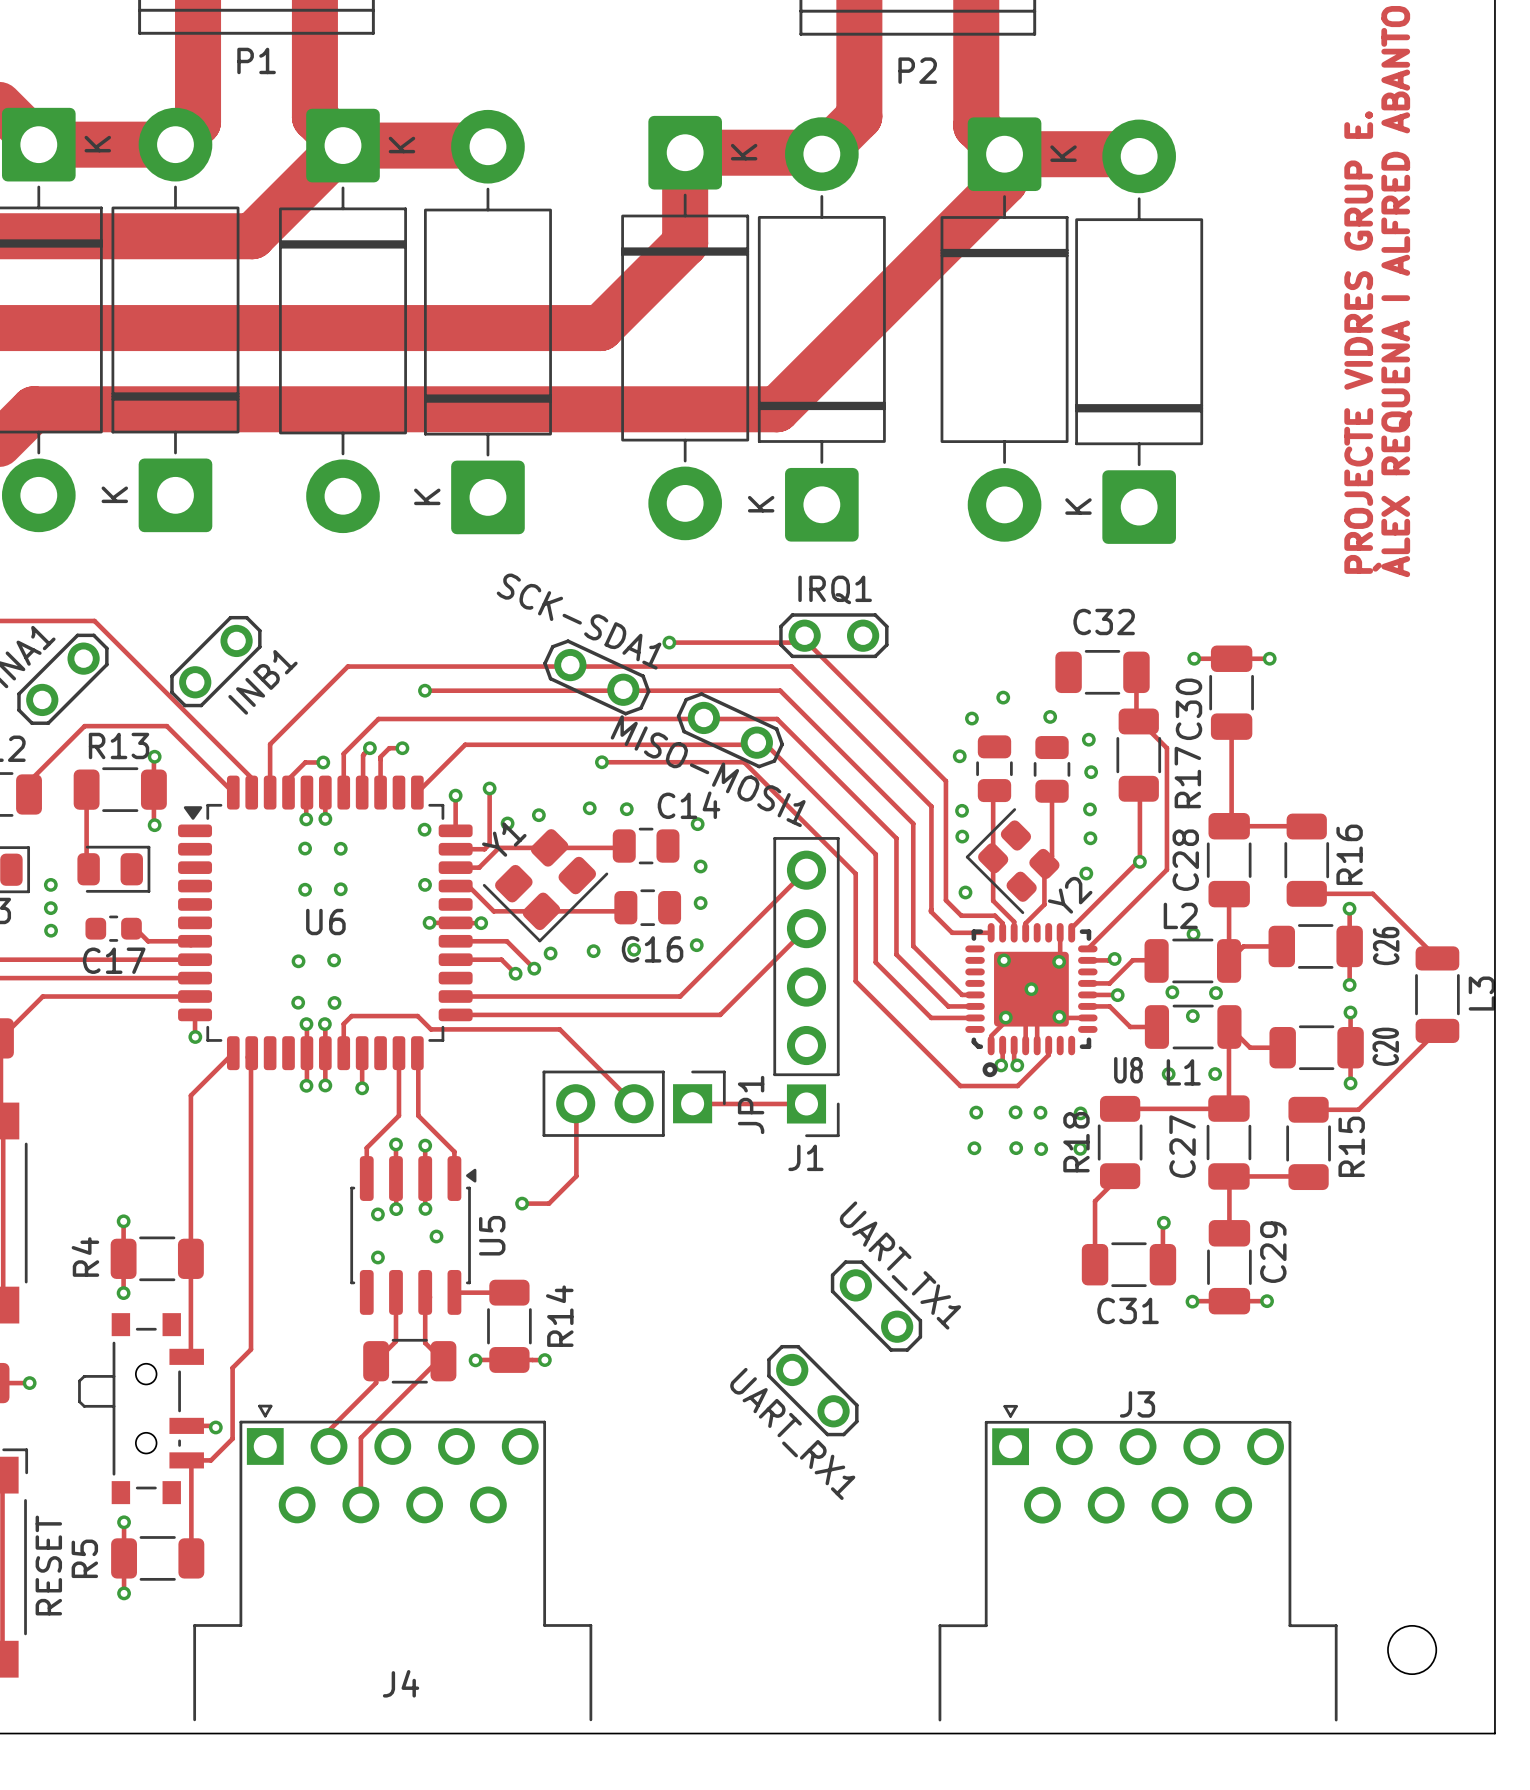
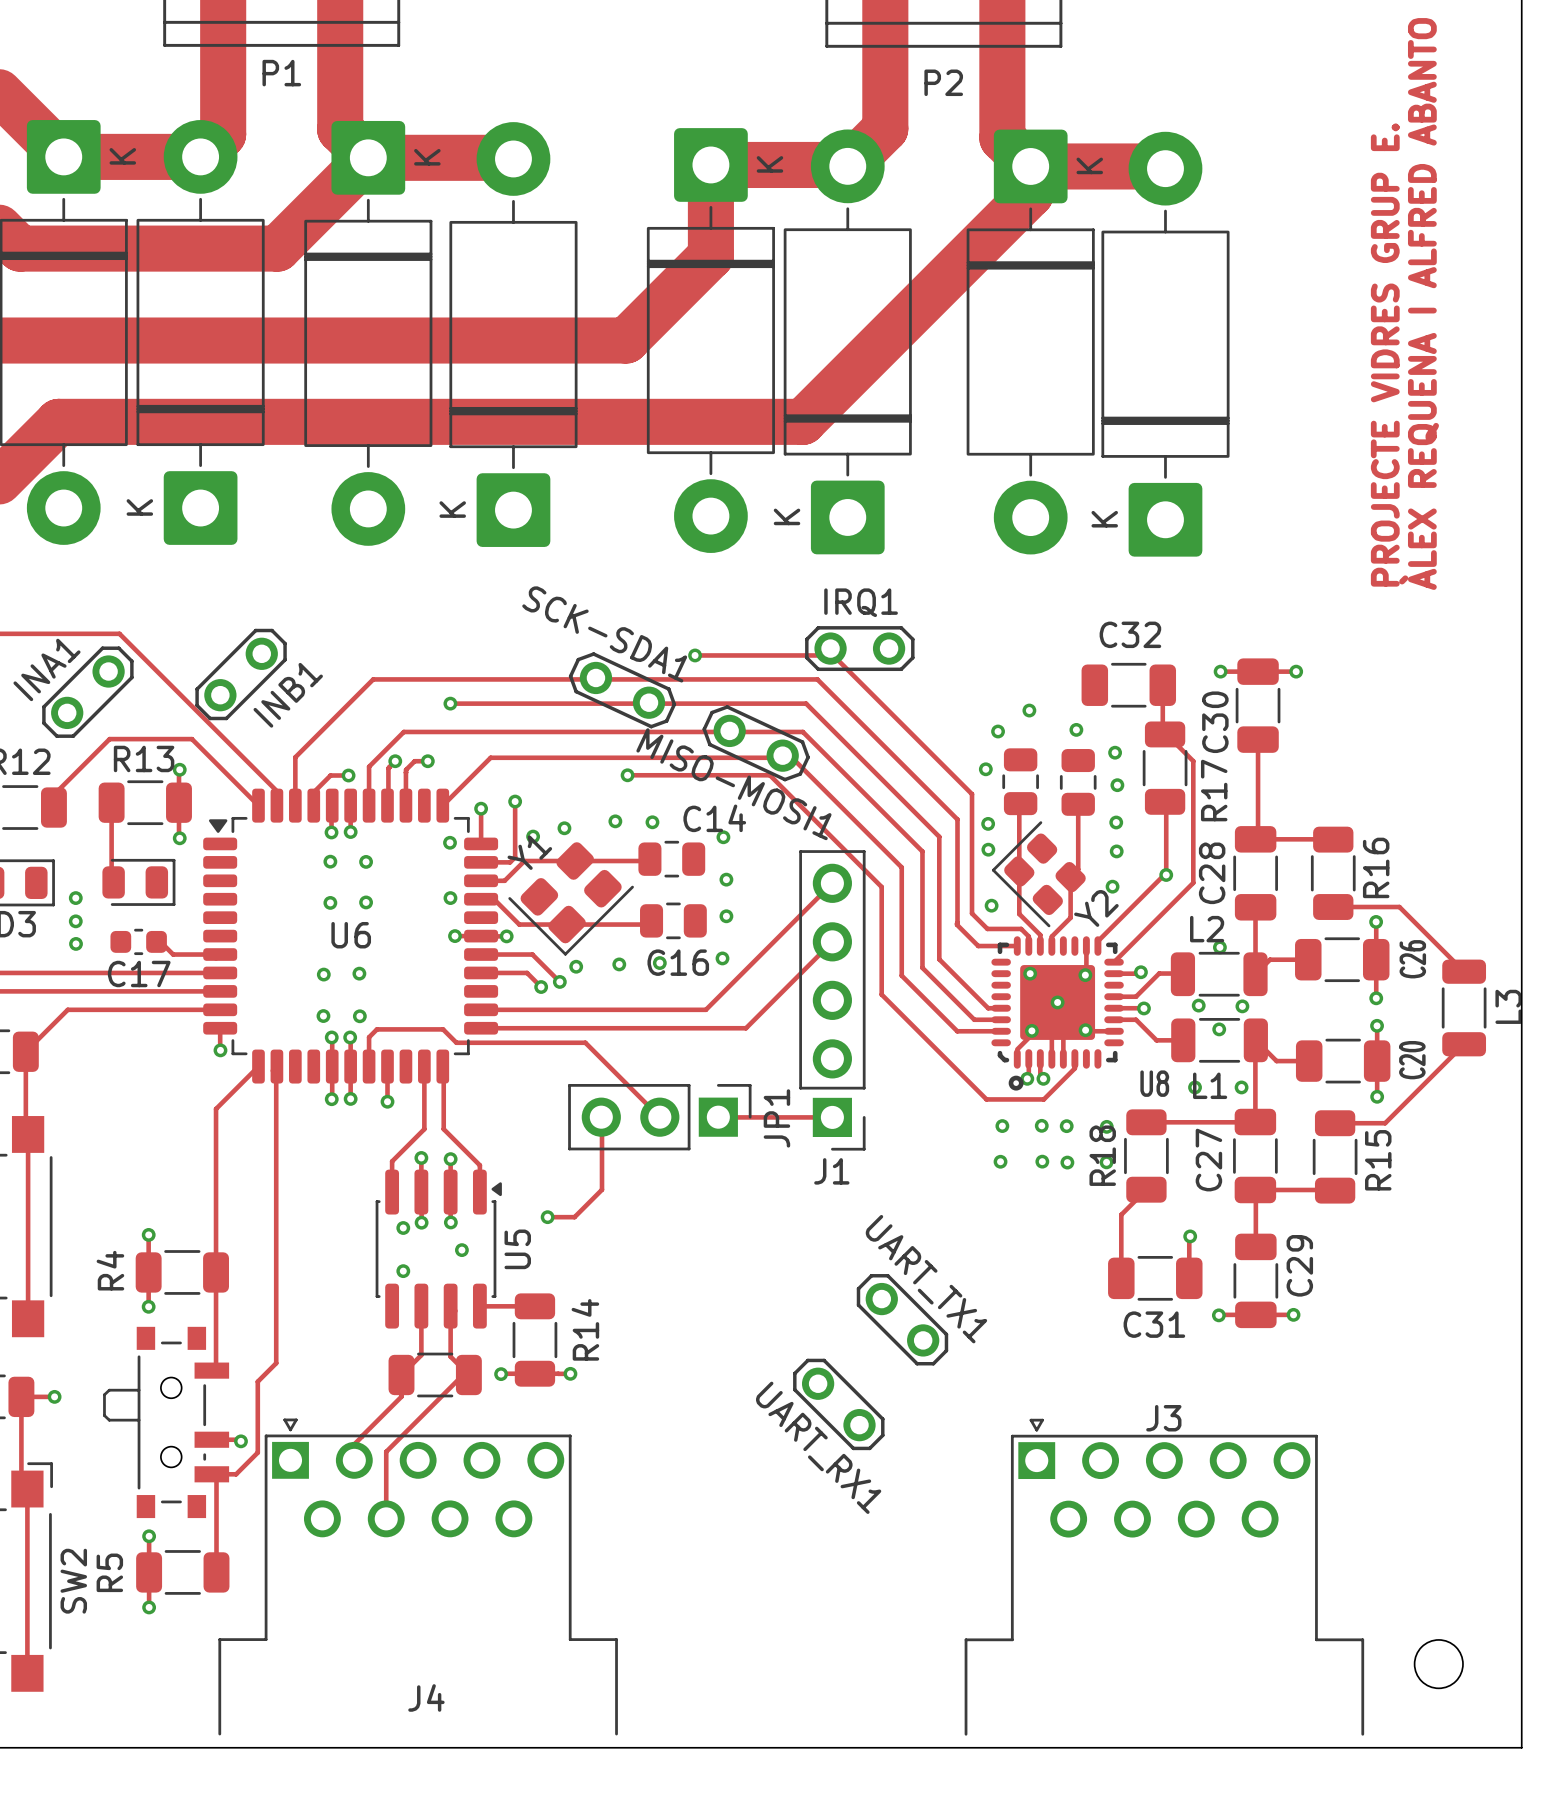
RESET name: RESET (48, 1565) -> SW2 (73, 1581)

